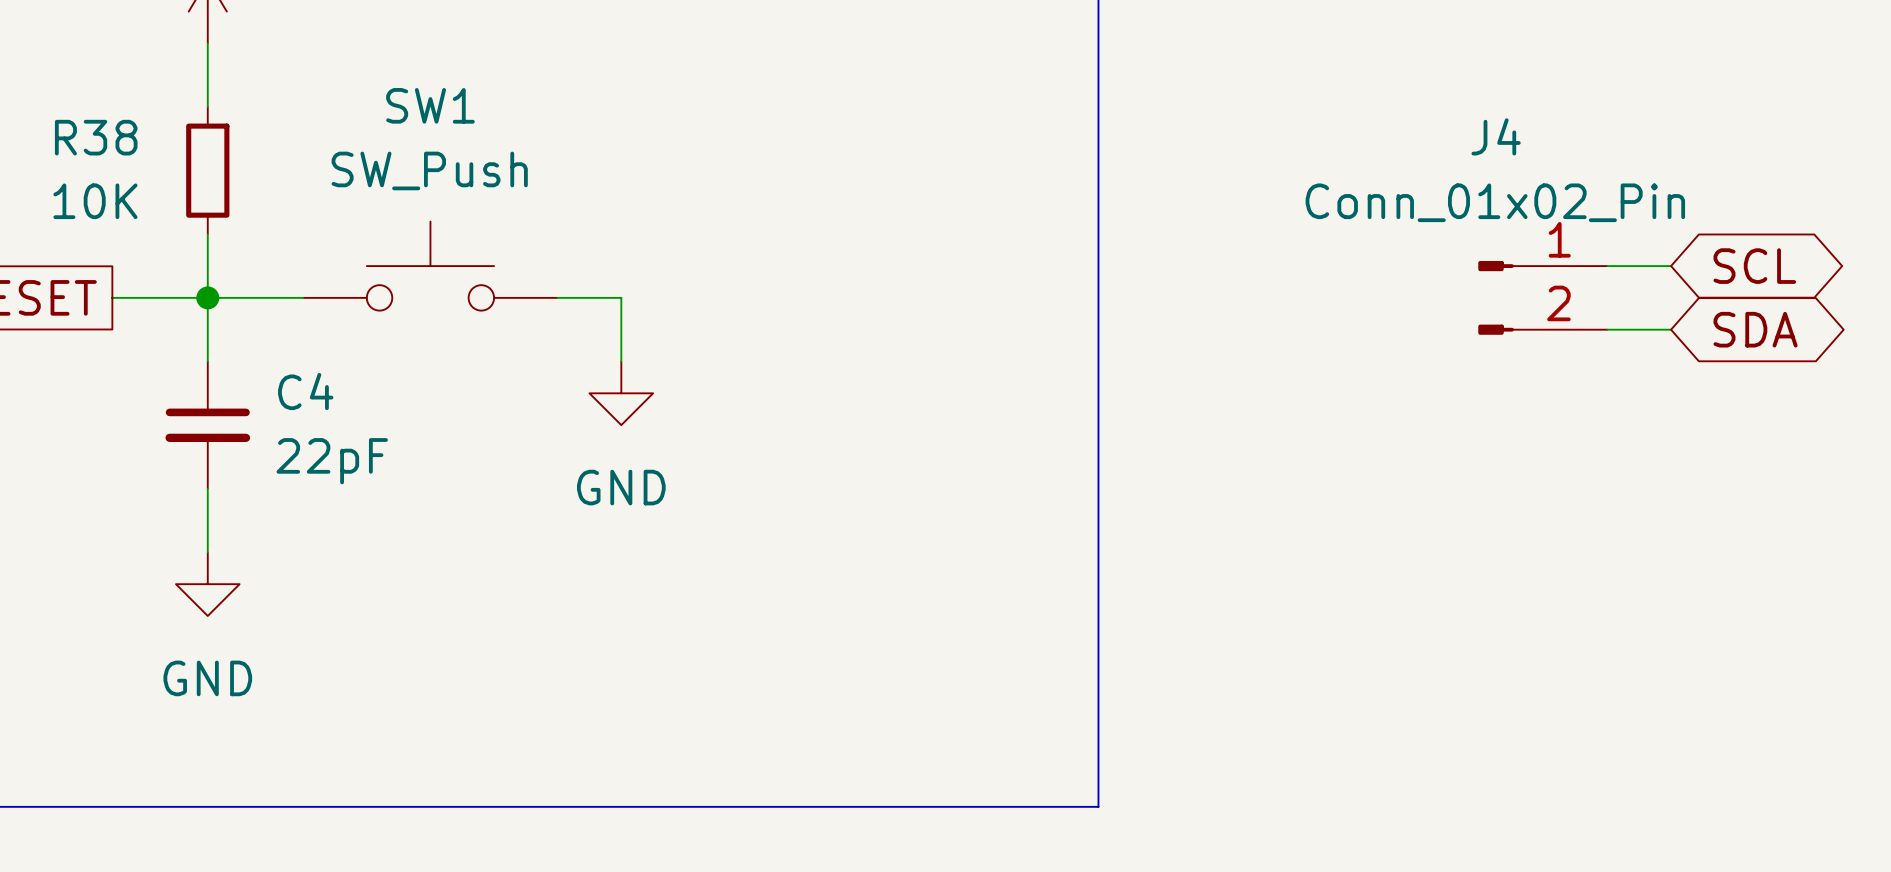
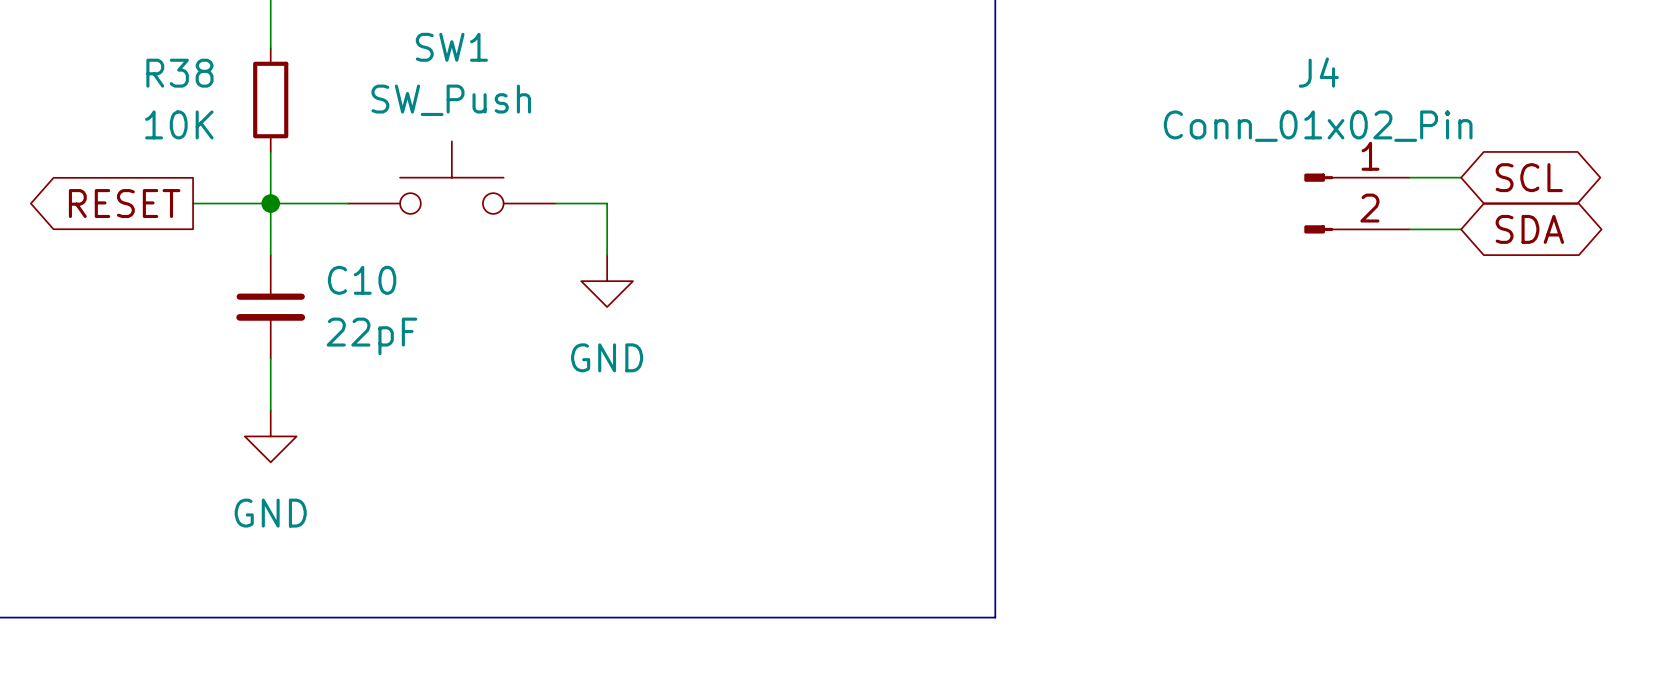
C4 name: C4 (305, 391) -> C10 (362, 280)

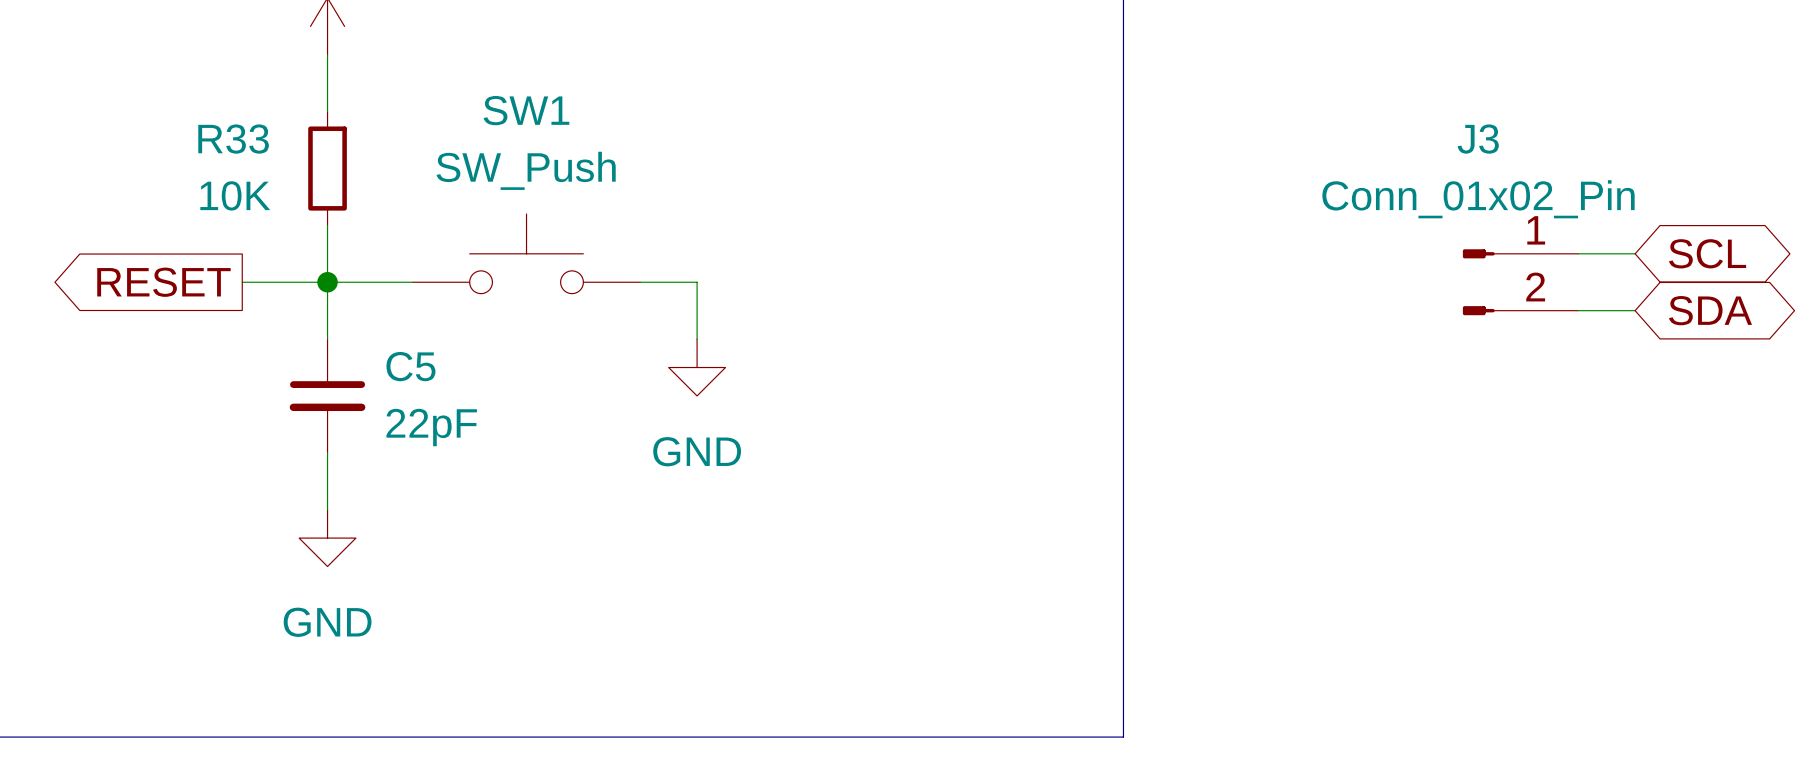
J4 name: J4 (1318, 72) -> J3 (1478, 139)
R38 name: R38 (179, 73) -> R33 (233, 139)
C10 name: C10 (362, 280) -> C5 (410, 366)

